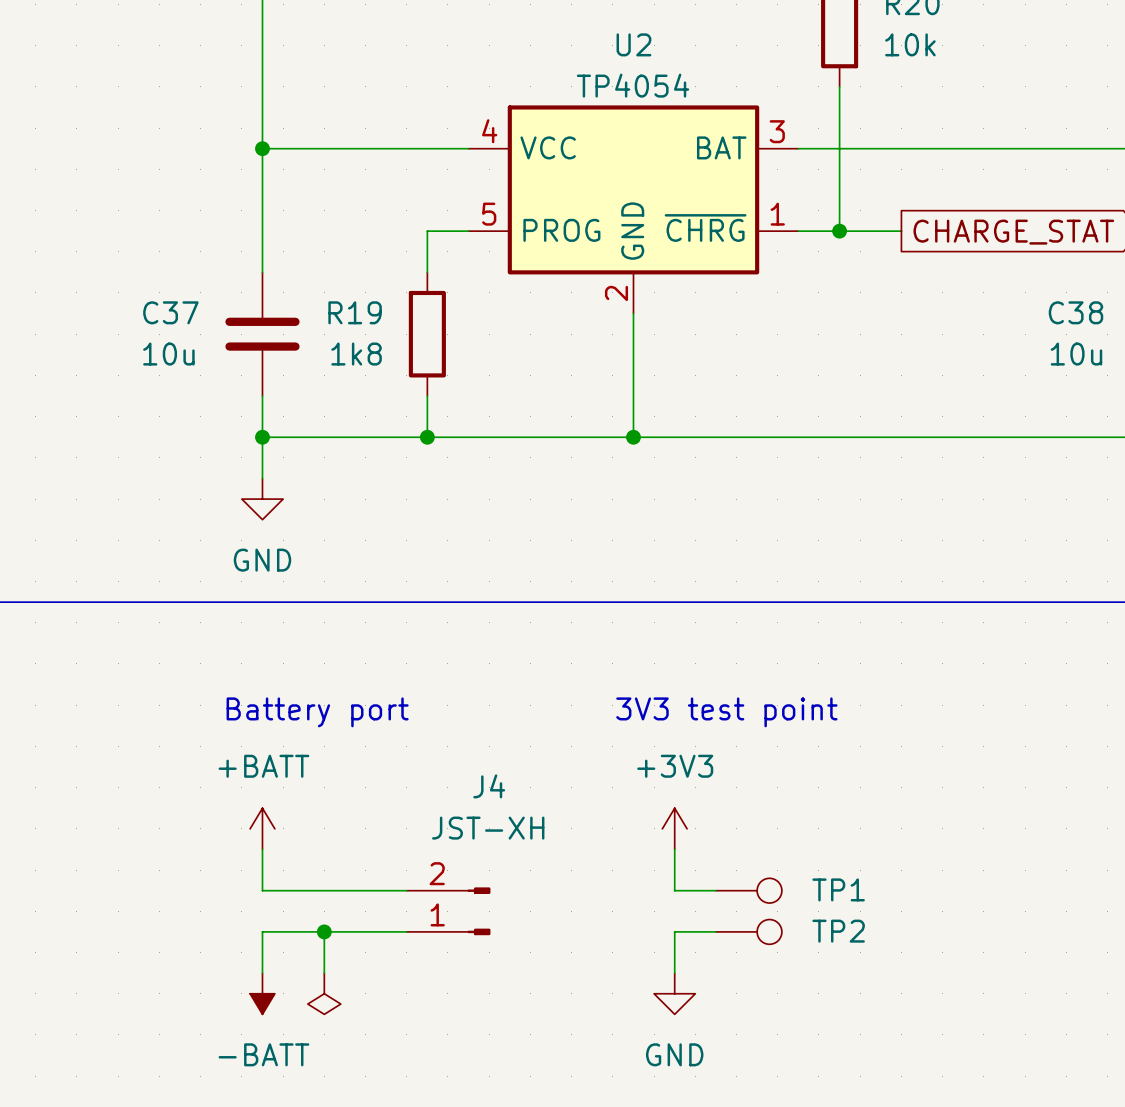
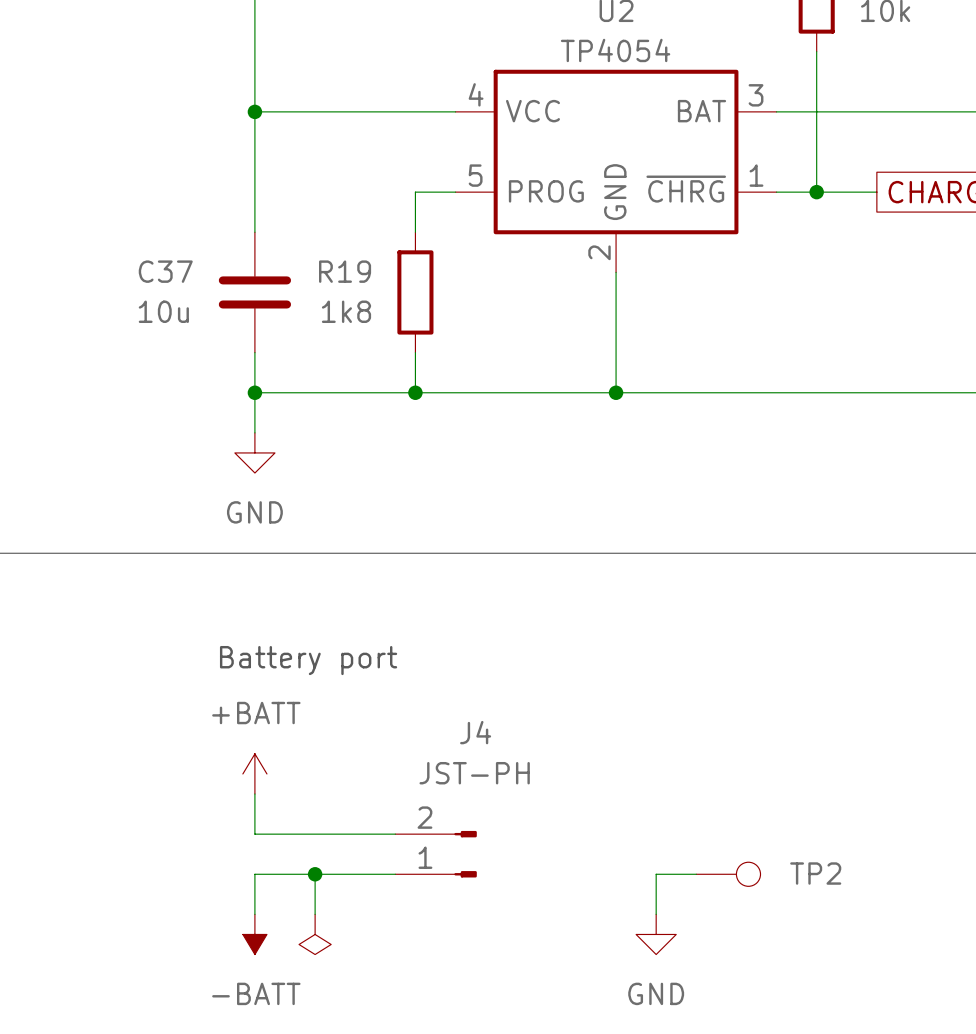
text: 3V3 test point (726, 712) -> none
J4 value: JST-XH (488, 828) -> JST-PH (474, 773)
power symbol: +3V3 (674, 828) -> none
wire: (674, 849) (674, 890) (715, 890) -> none
TP1: (748, 890) -> none

